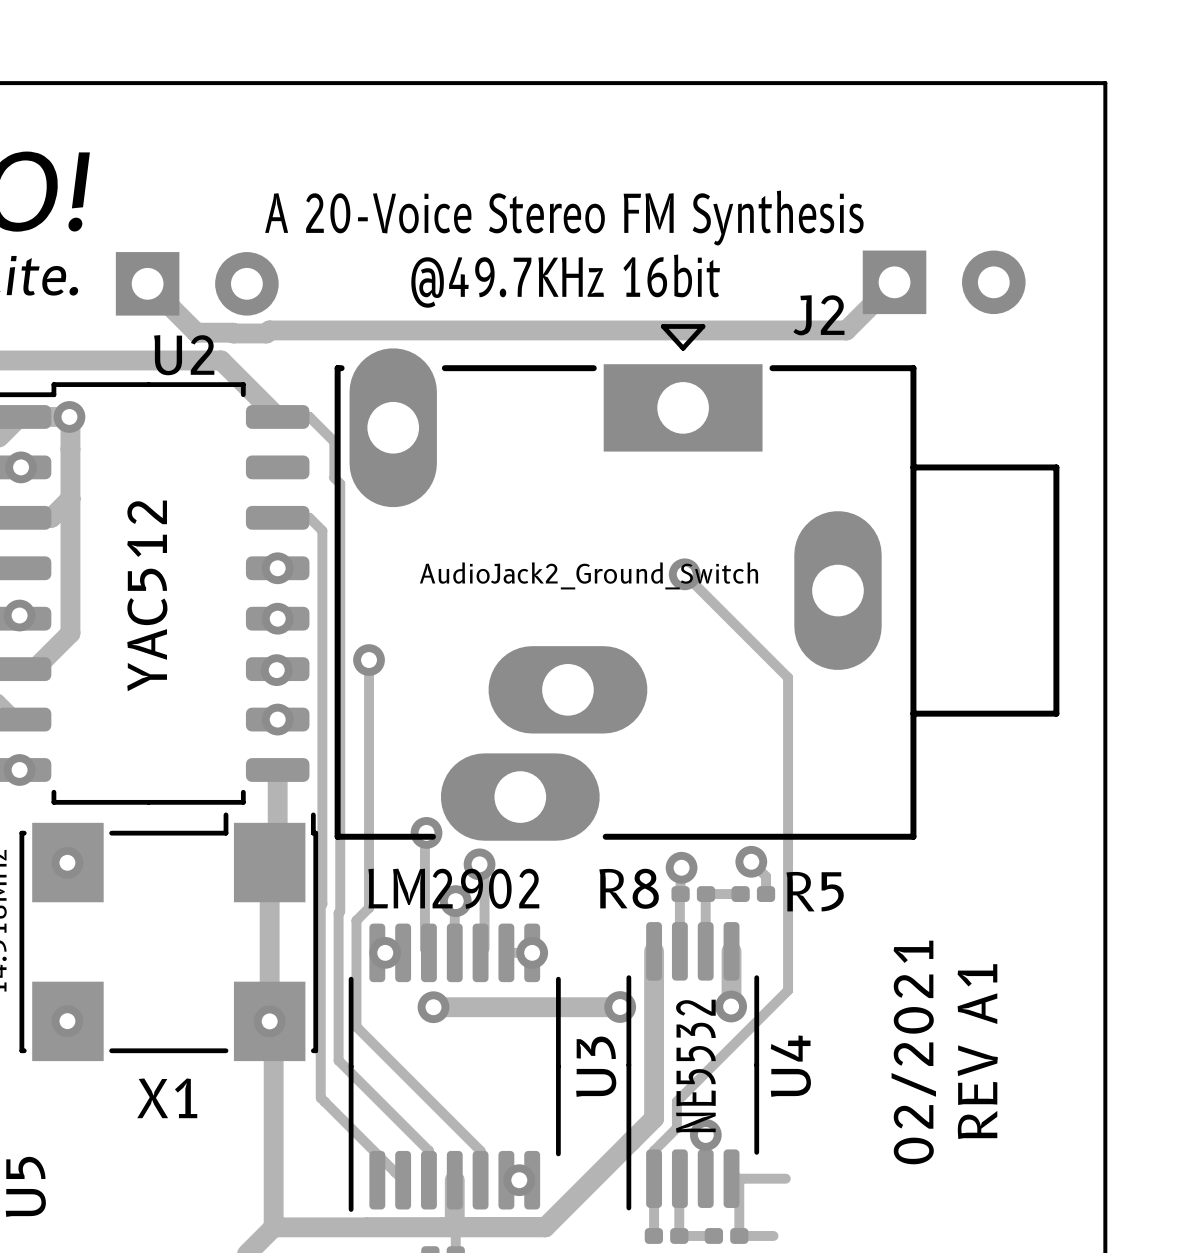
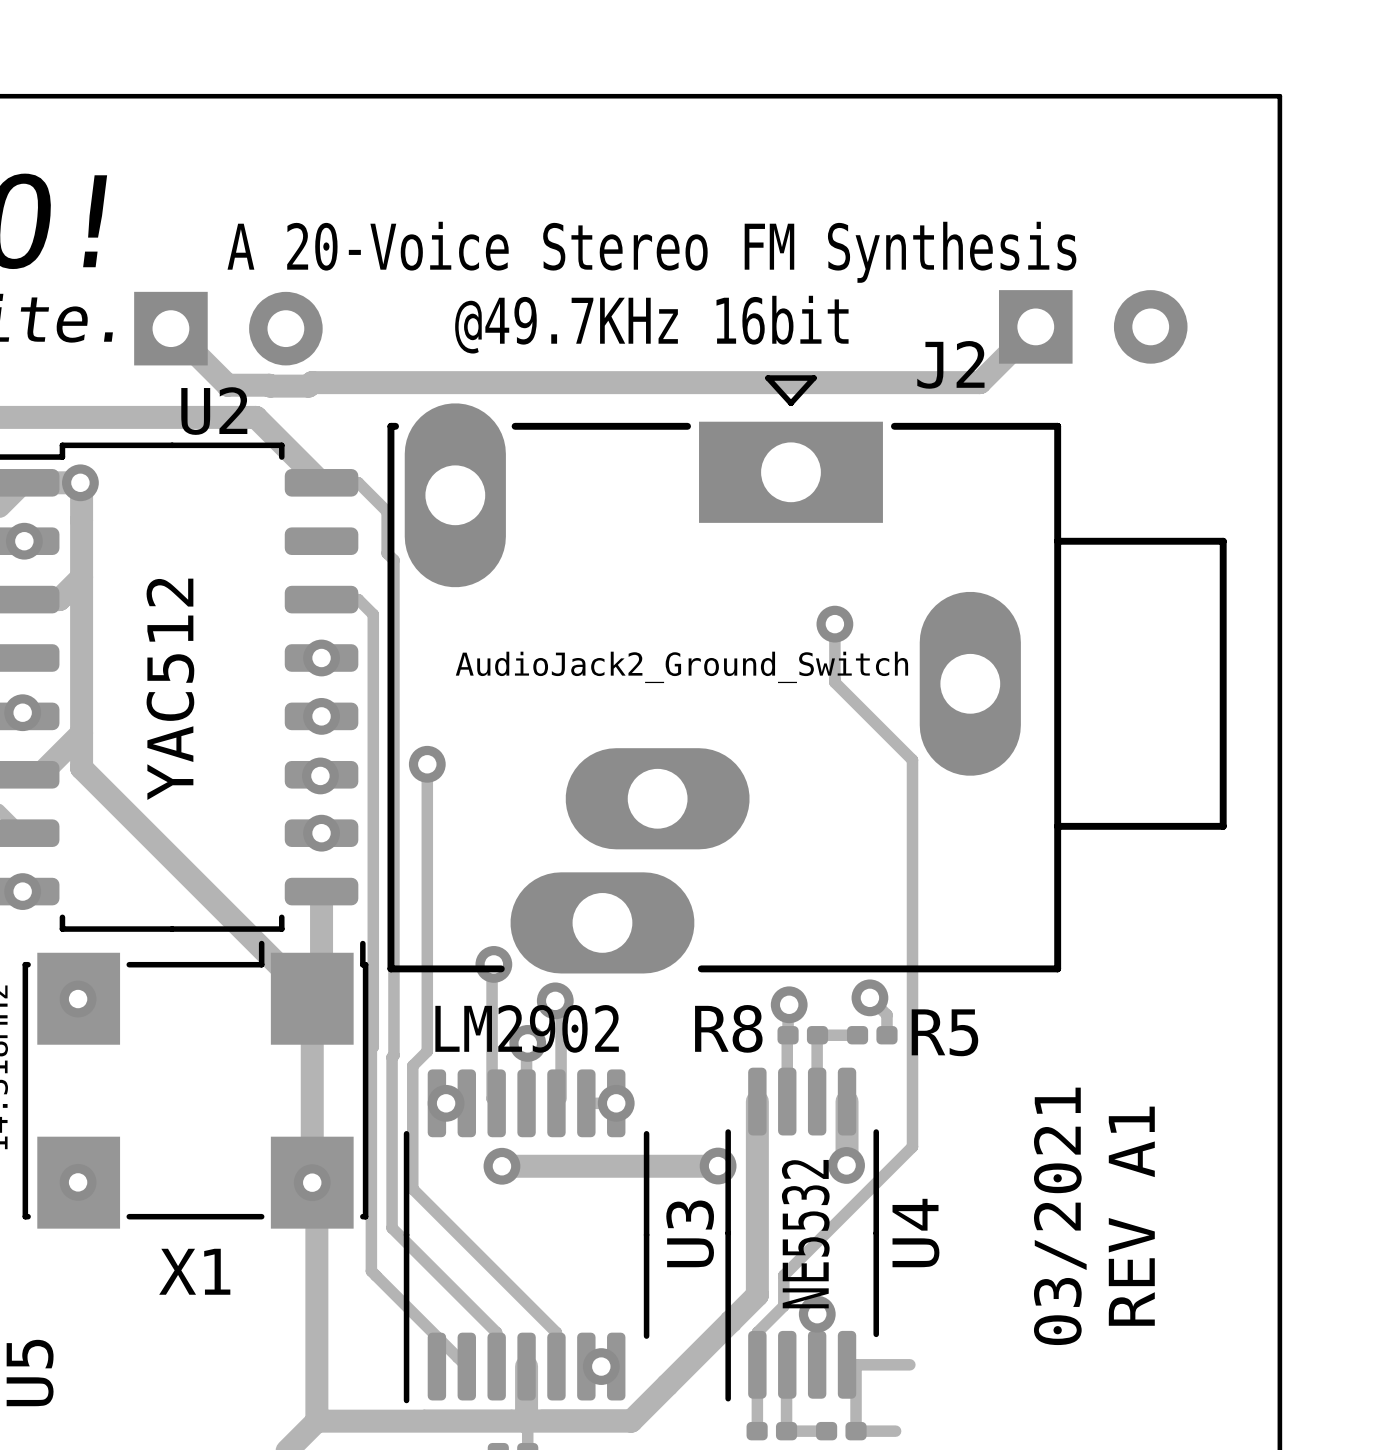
track: (684, 574) (788, 677) -> (834, 627) (834, 682) (912, 760) (912, 784)
via position: (684, 574) -> (834, 624)
track: none -> (81, 733) (81, 768) (312, 998)
text: 02/2021 (913, 1052) -> 03/2021 (1060, 1216)

